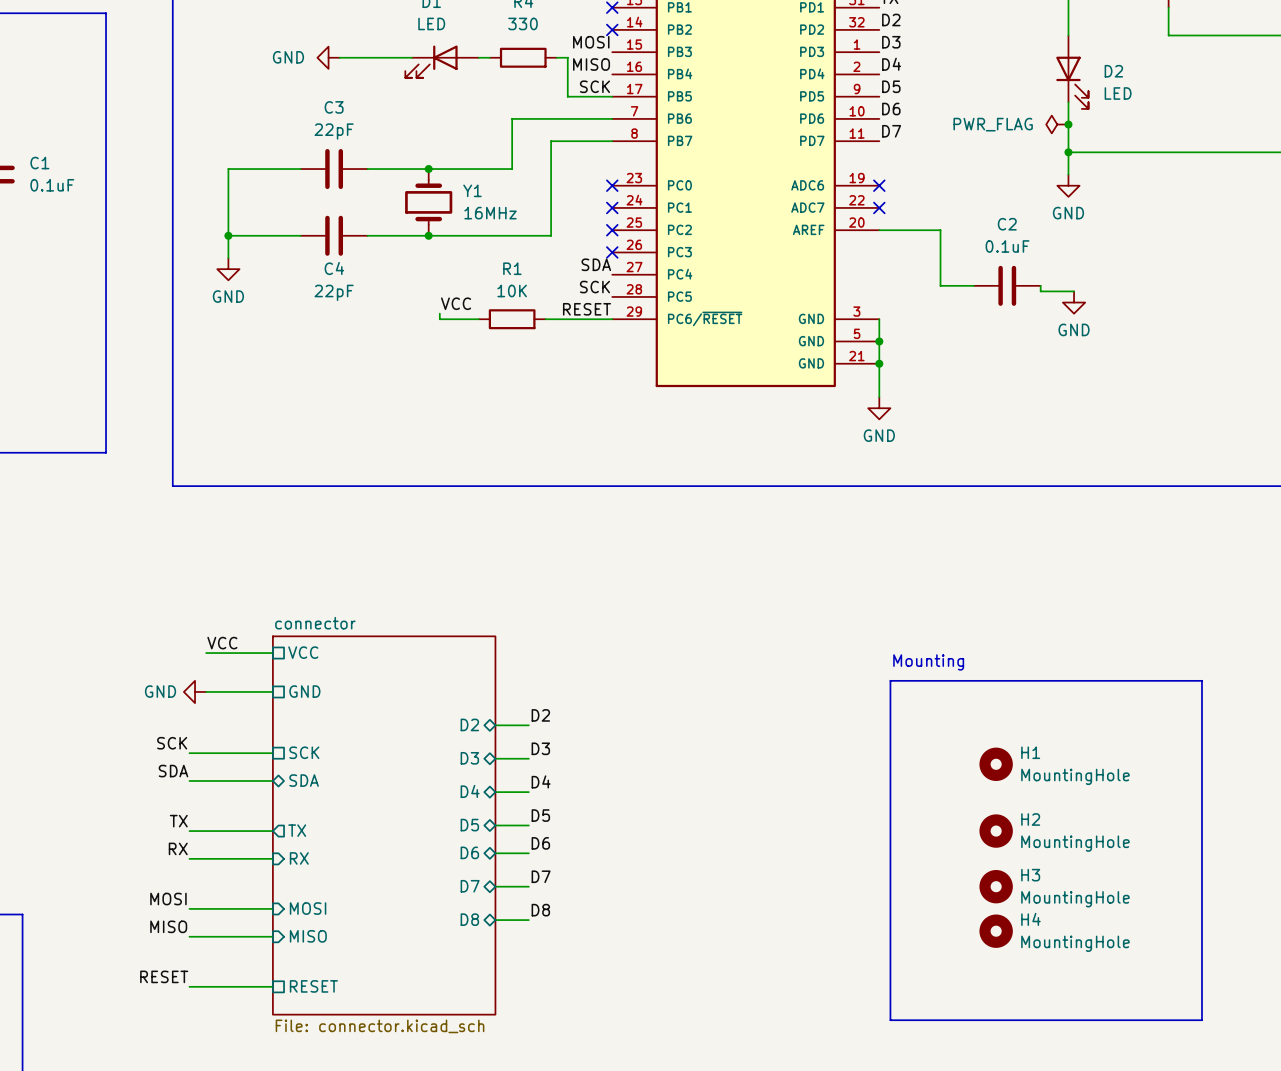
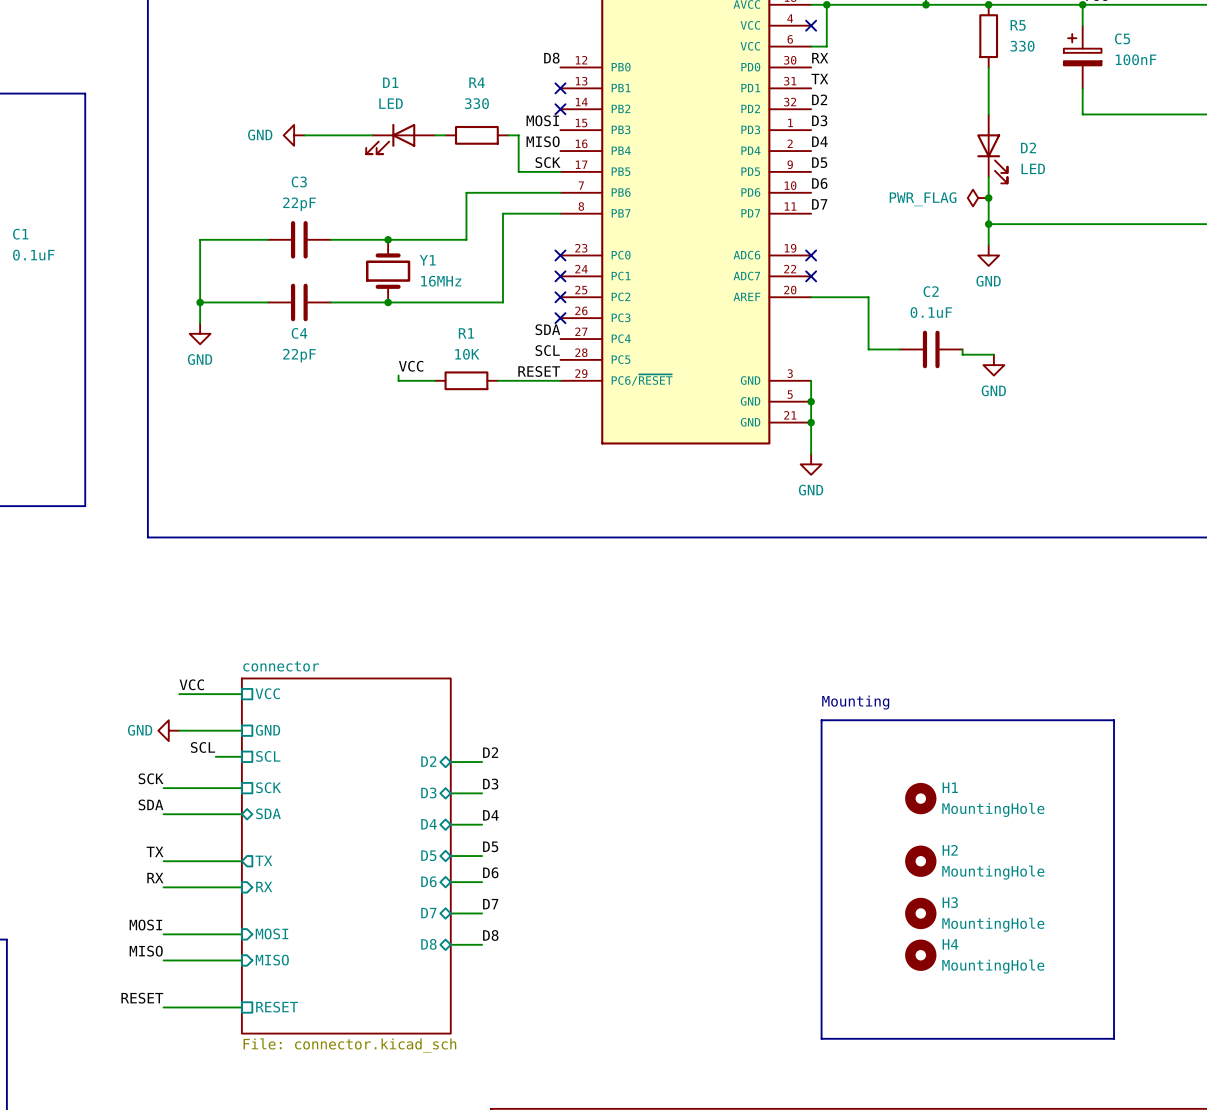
label: SCK (594, 287) -> SCL (547, 350)
label: none -> SCL (203, 747)
wire: none -> (215, 756) (241, 756)
sheet pin: none -> SCL (268, 756)

